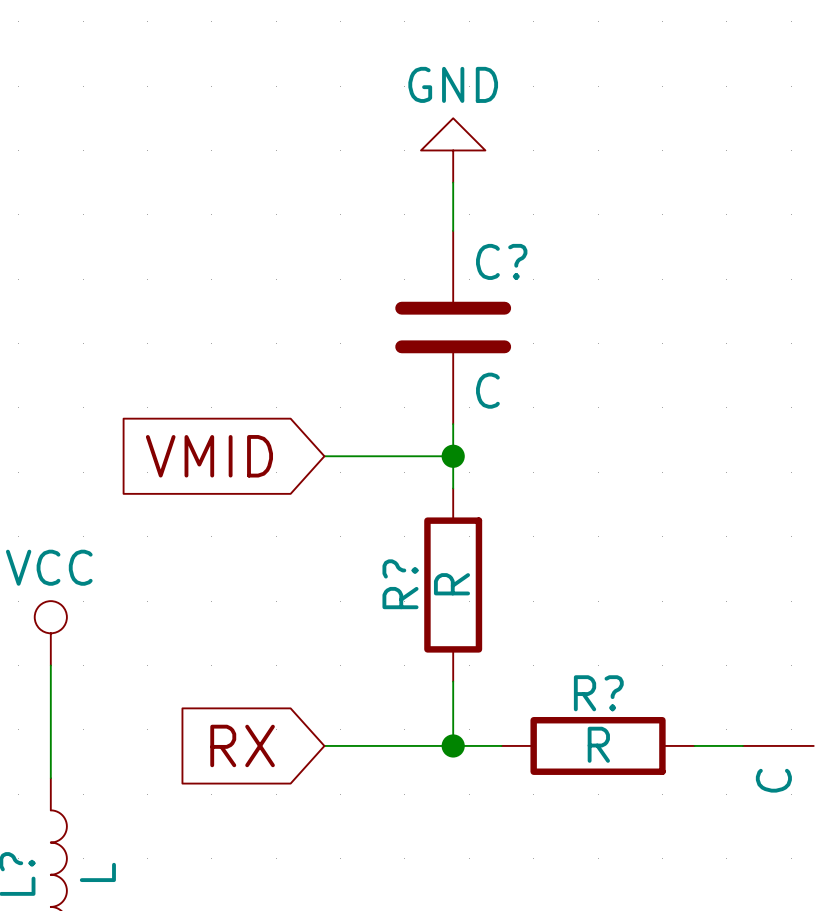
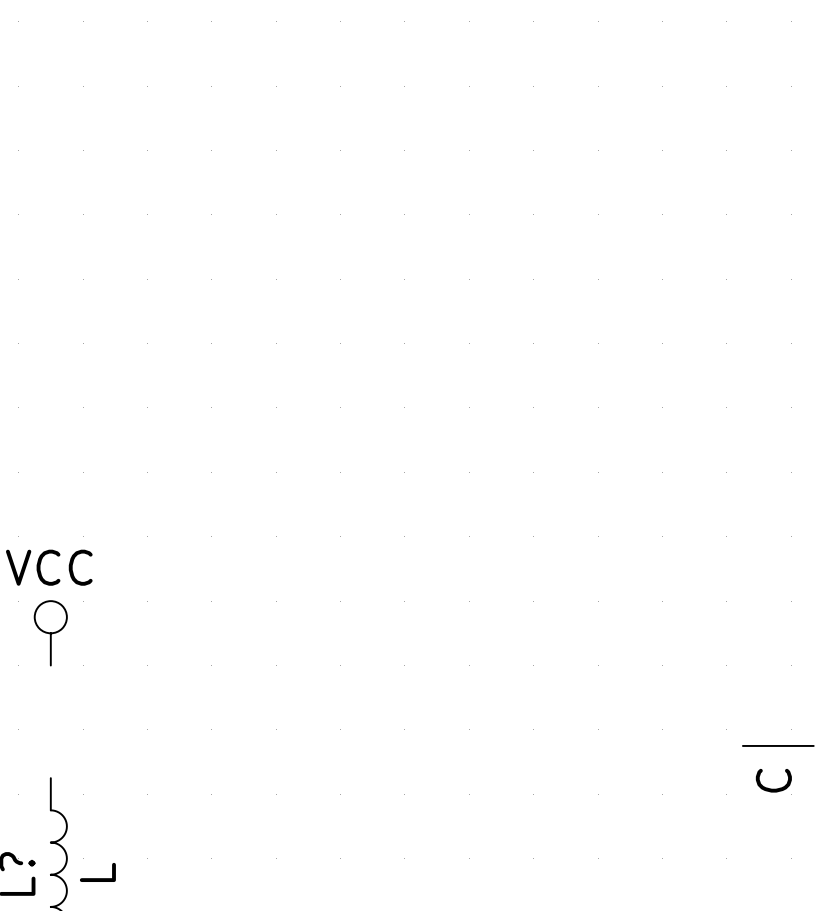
power symbol: GND (453, 150) -> none
wire: (453, 182) (453, 230) -> none
C?: C (453, 327) -> none
wire: (453, 424) (453, 488) -> none
global label: VMID (209, 456) -> none
wire: (324, 456) (453, 456) -> none
junction: (453, 456) -> none
R?: R (453, 585) -> none
wire: (50, 665) (50, 778) -> none
wire: (453, 681) (453, 745) -> none
global label: RX (242, 745) -> none
wire: (324, 745) (501, 745) -> none
junction: (453, 745) -> none
R?: R (598, 745) -> none
wire: (694, 745) (742, 745) -> none

